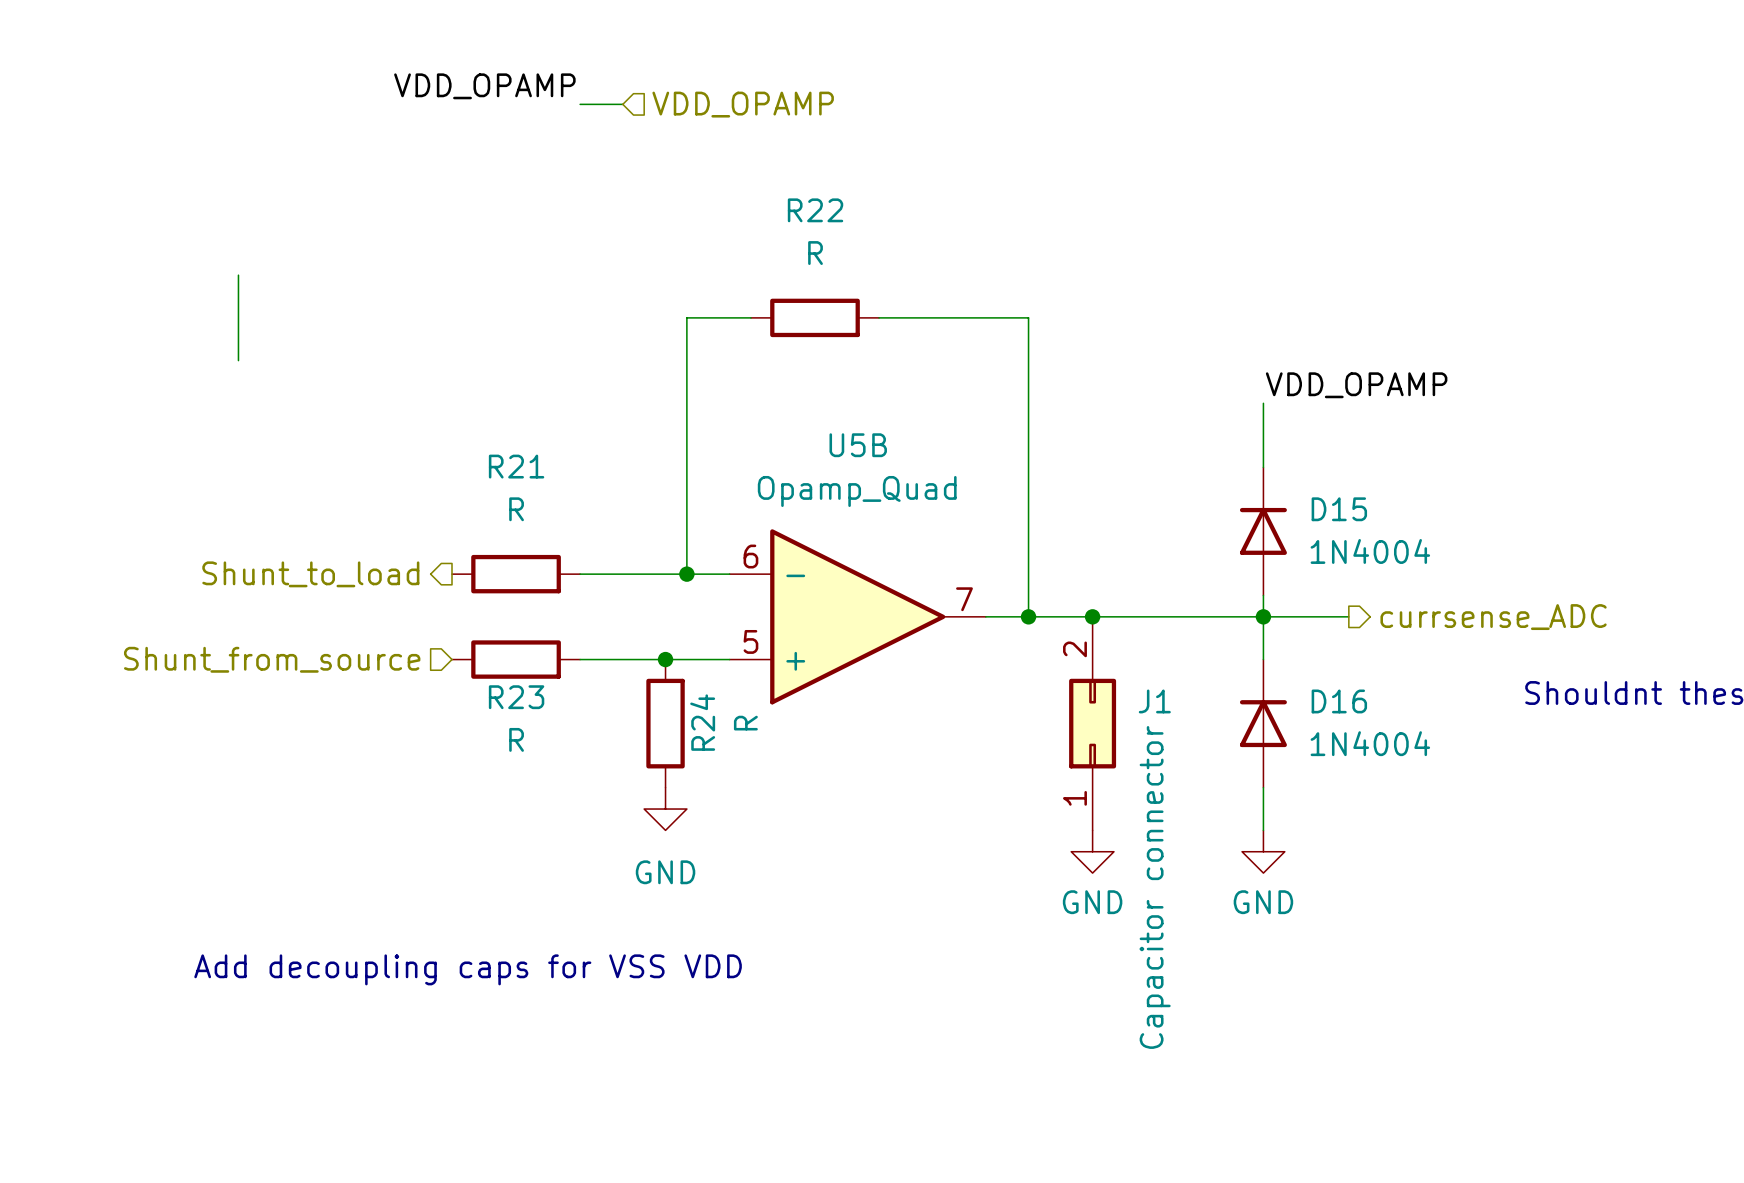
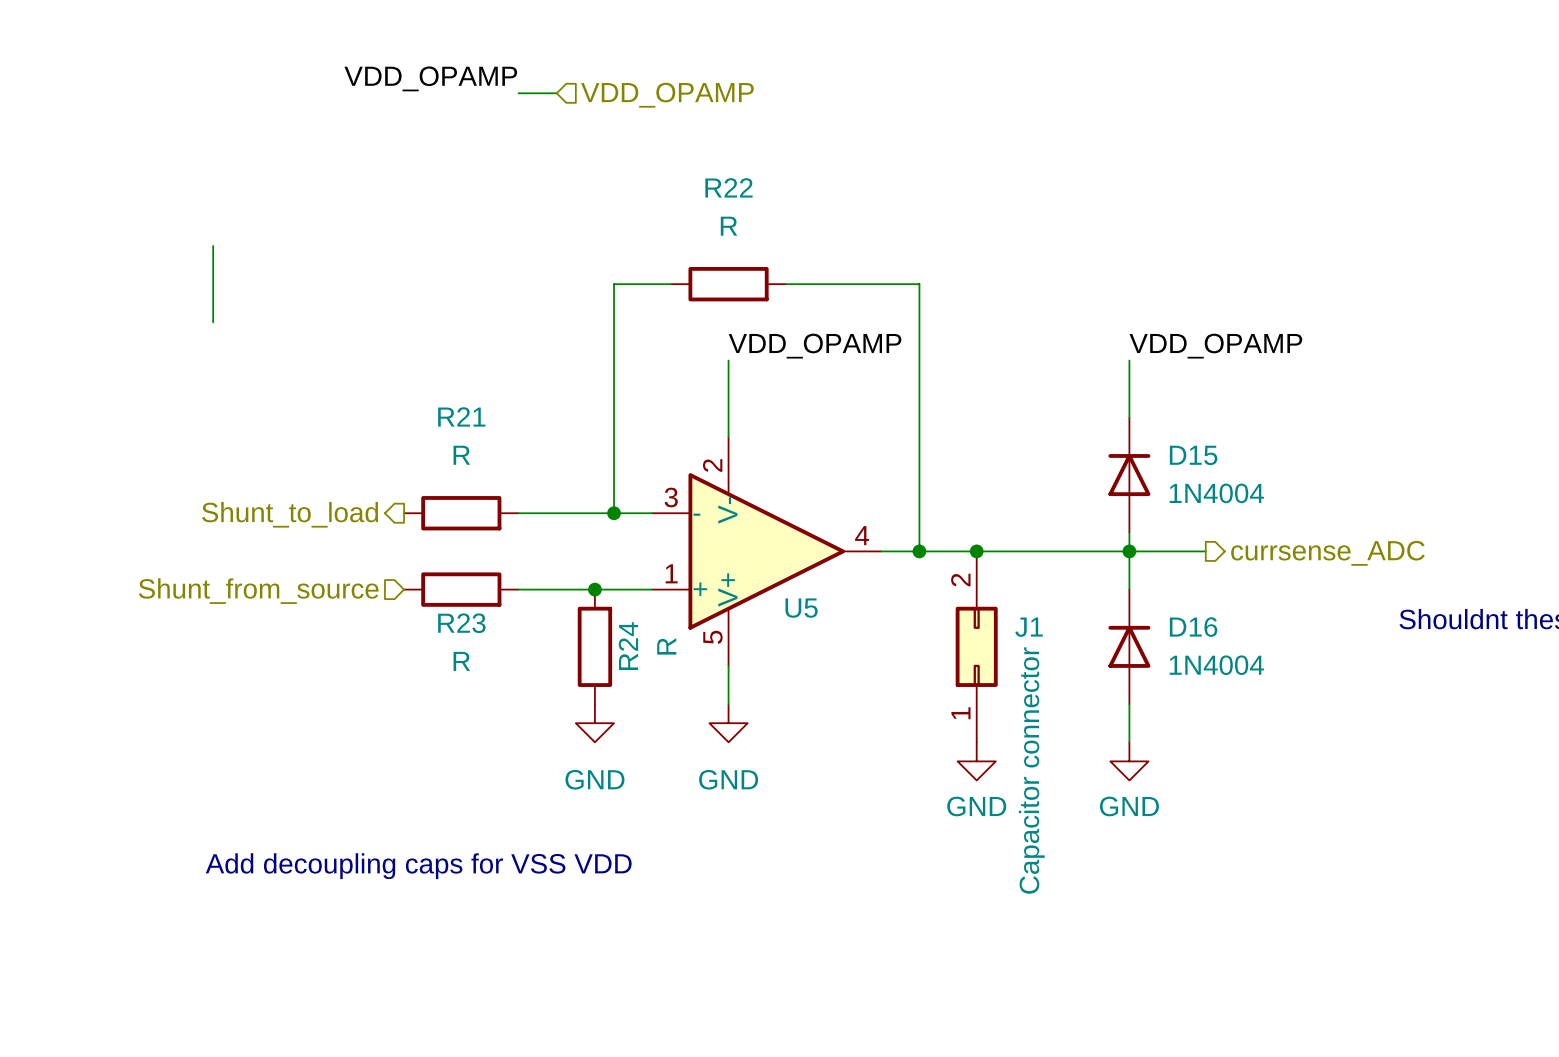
label: none -> VDD_OPAMP (814, 346)
wire: none -> (728, 360) (728, 436)
U5B: Opamp_Quad (857, 616) -> none
U5: none -> (766, 551)
wire: none -> (728, 665) (728, 704)
power symbol: none -> GND (728, 723)

